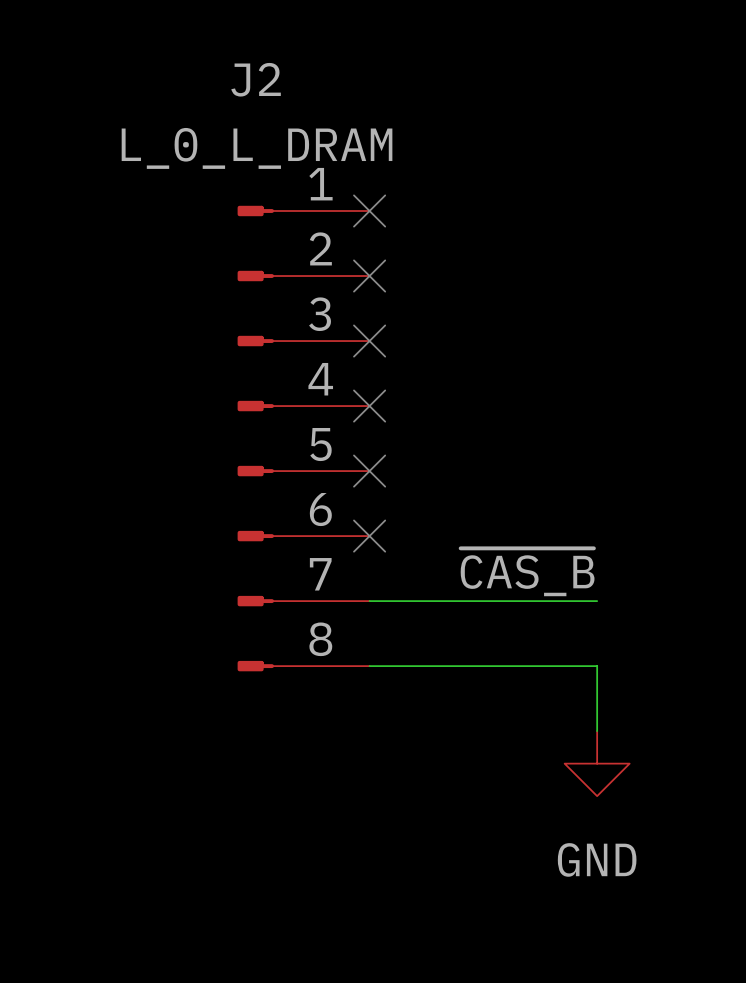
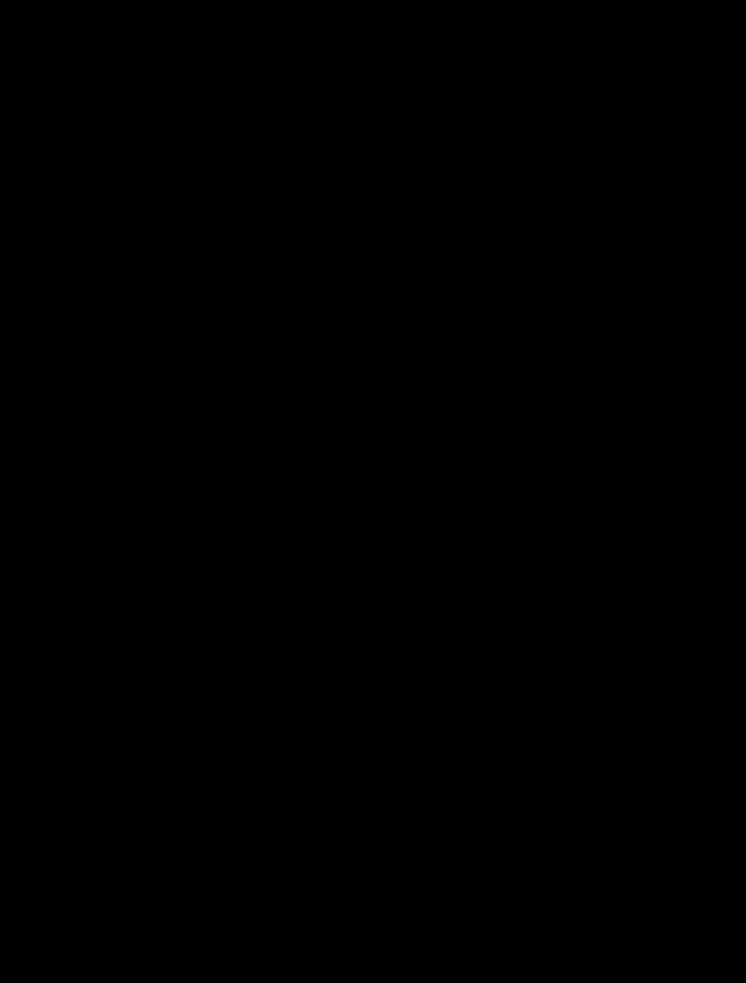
no-connect mark: (369, 211) -> none
no-connect mark: (369, 276) -> none
no-connect mark: (369, 341) -> none
no-connect mark: (369, 406) -> none
J2: L_0_L_DRAM (303, 438) -> none
no-connect mark: (369, 471) -> none
no-connect mark: (369, 536) -> none
label: ~{CAS_B} (527, 572) -> none
wire: (369, 601) (597, 601) -> none
wire: (369, 666) (597, 666) (597, 731) -> none
power symbol: GND (597, 763) -> none

